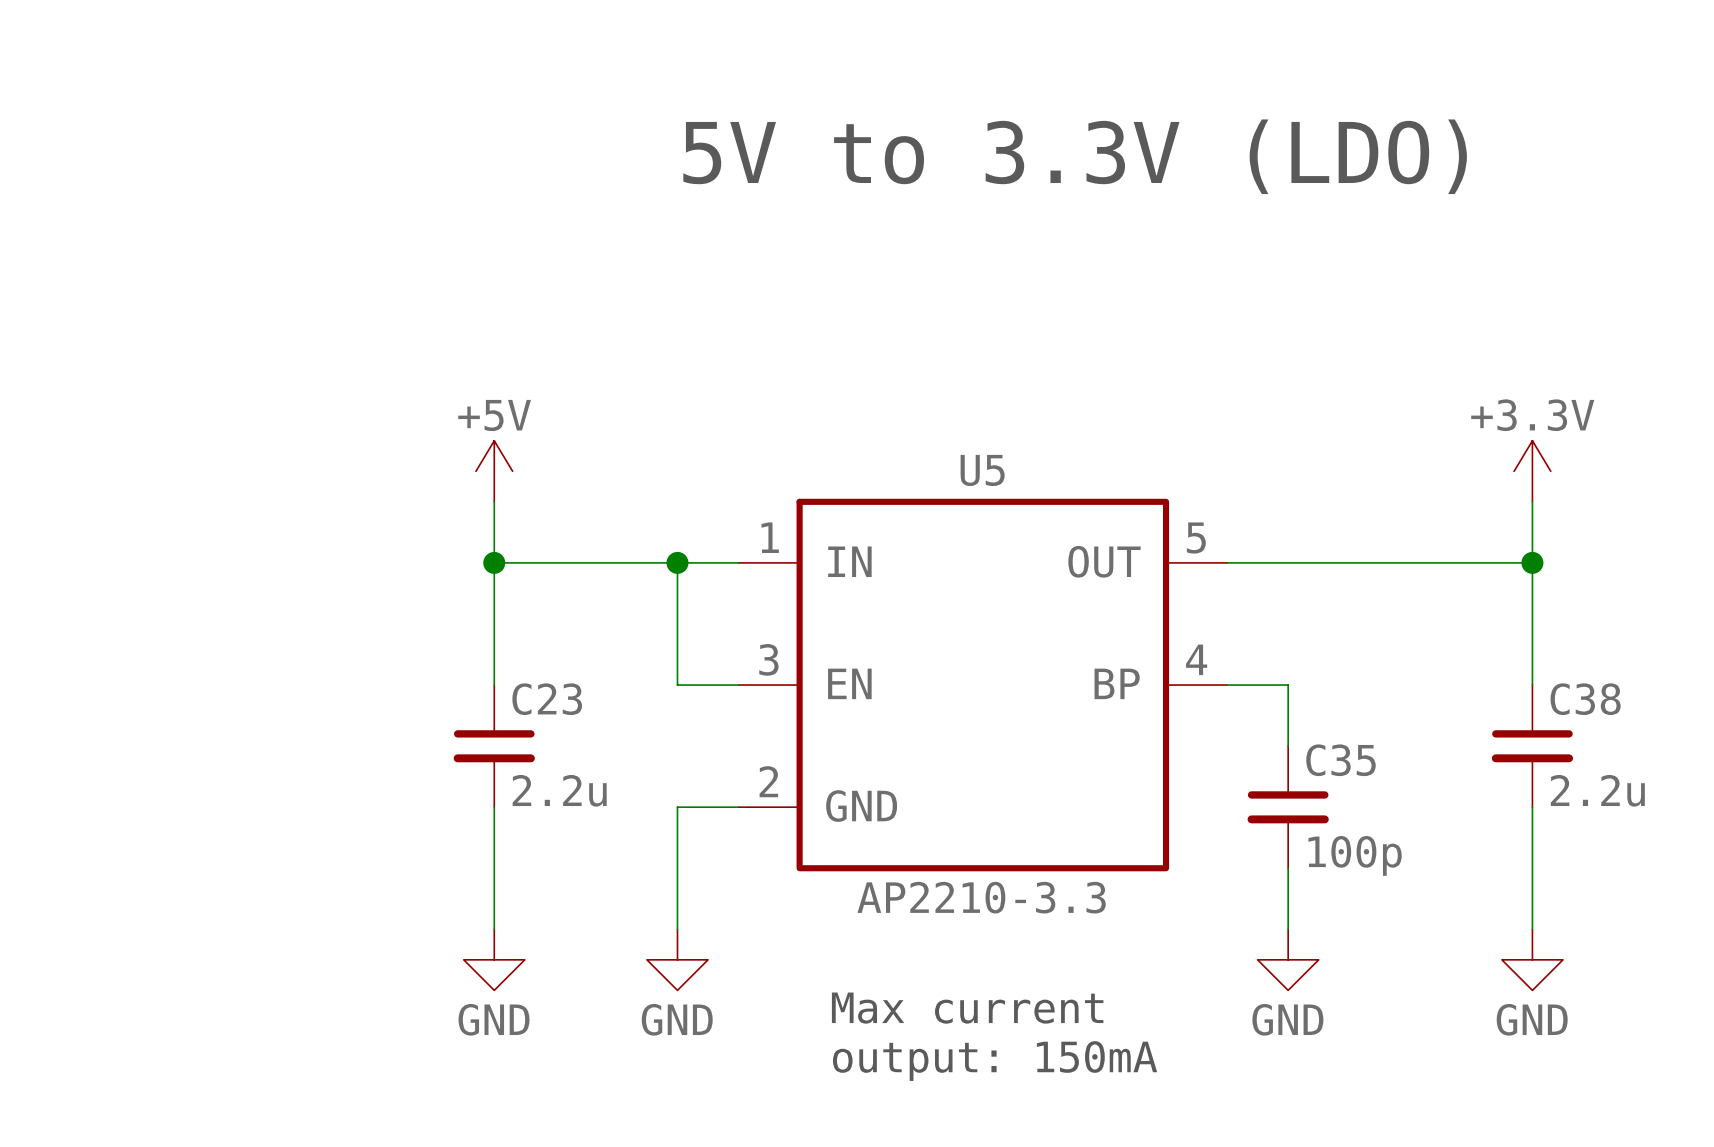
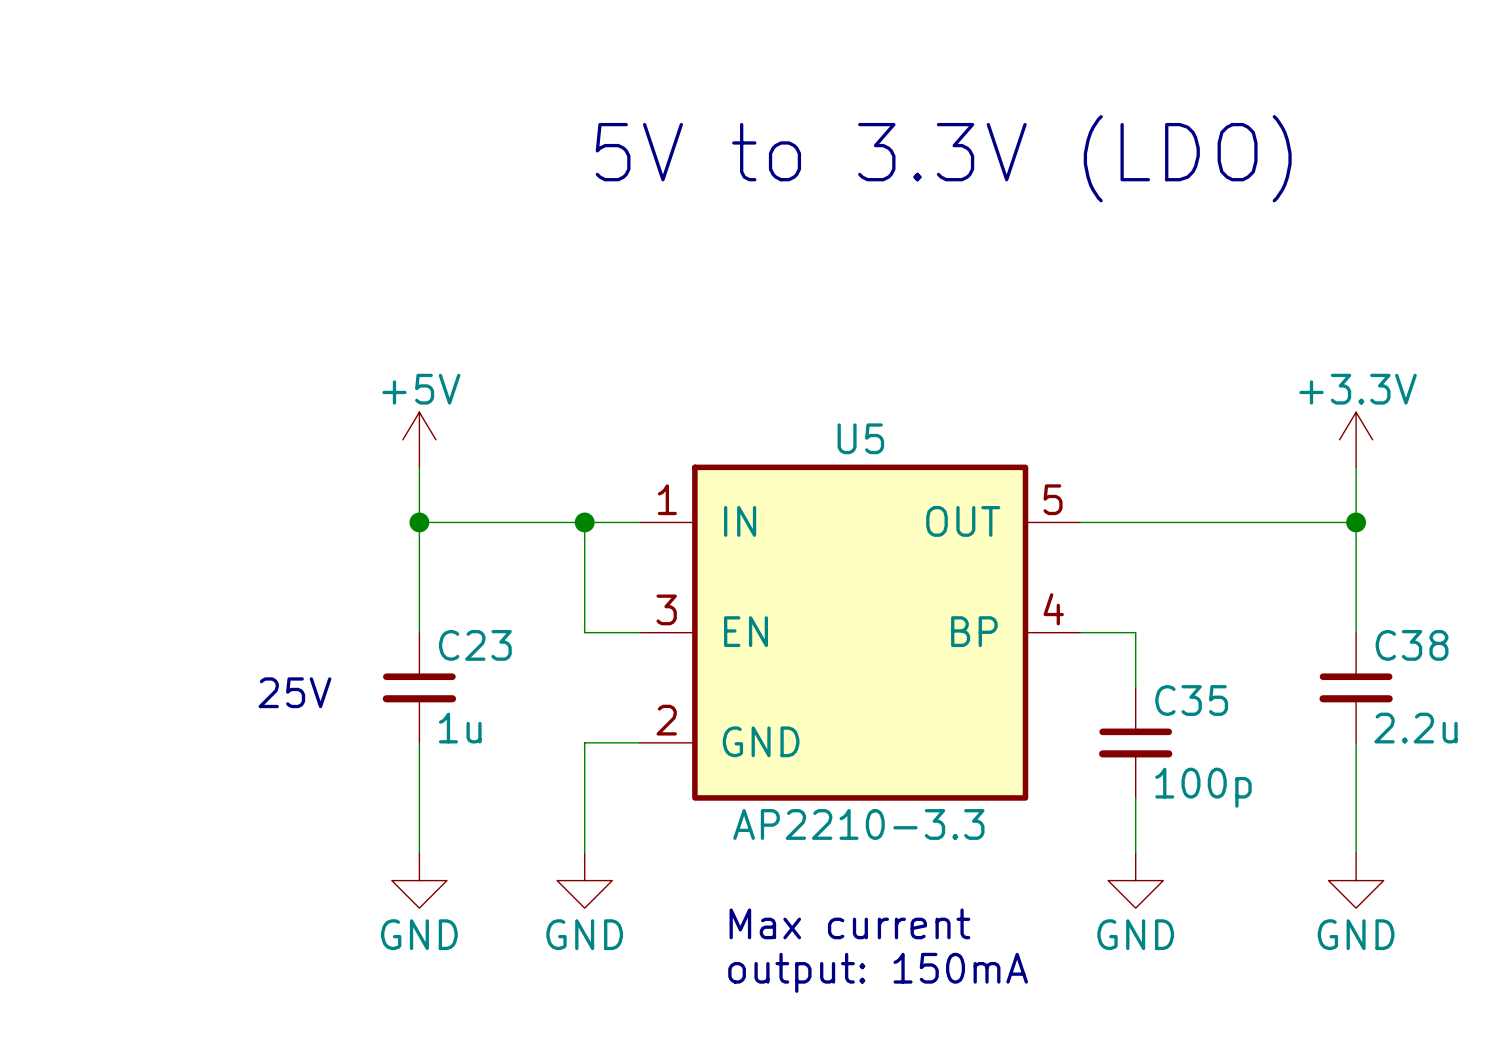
text: none -> 25V (294, 692)
C23 value: 2.2u (559, 790) -> 1u (460, 728)

